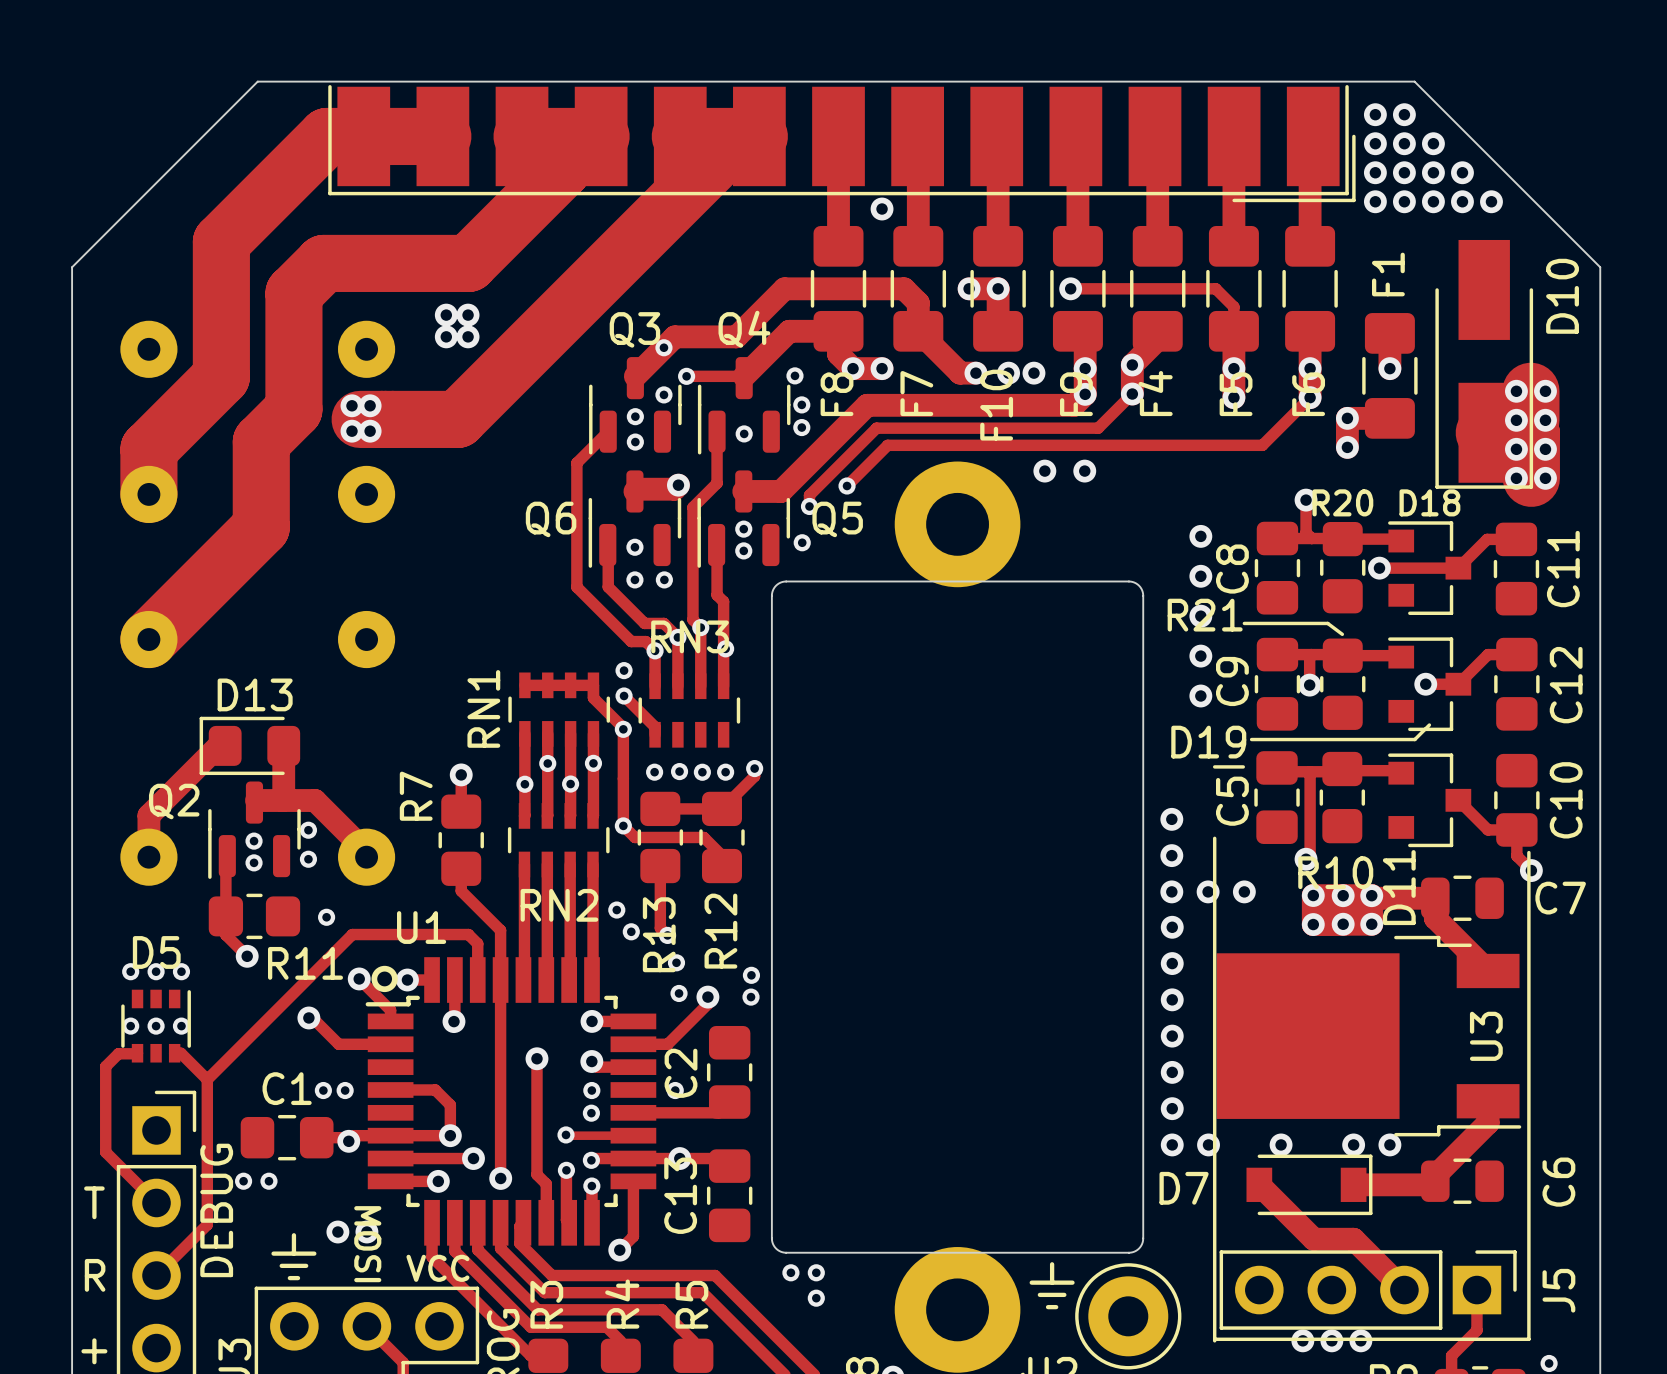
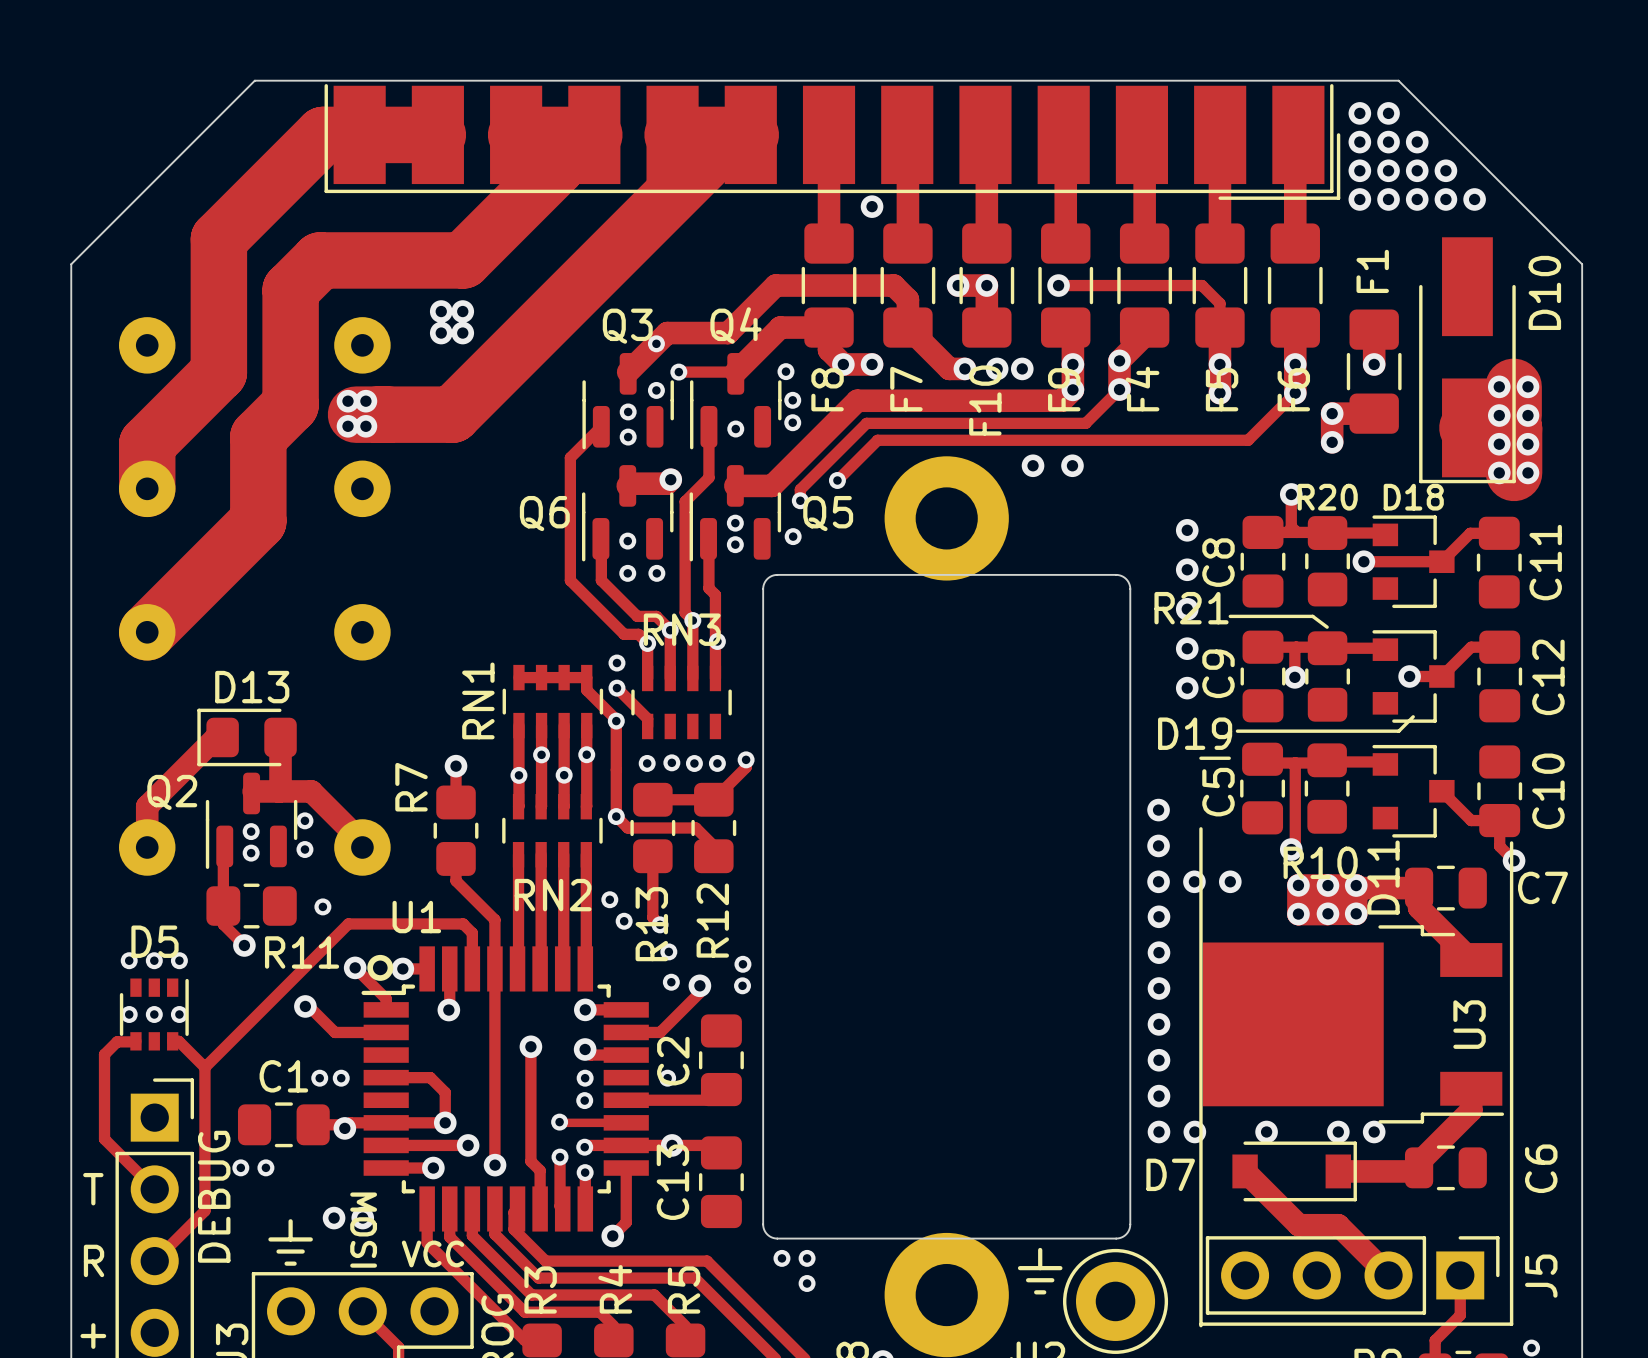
via: (1302, 1340) -> none
via: (1331, 1340) -> none
via: (1360, 1340) -> none

